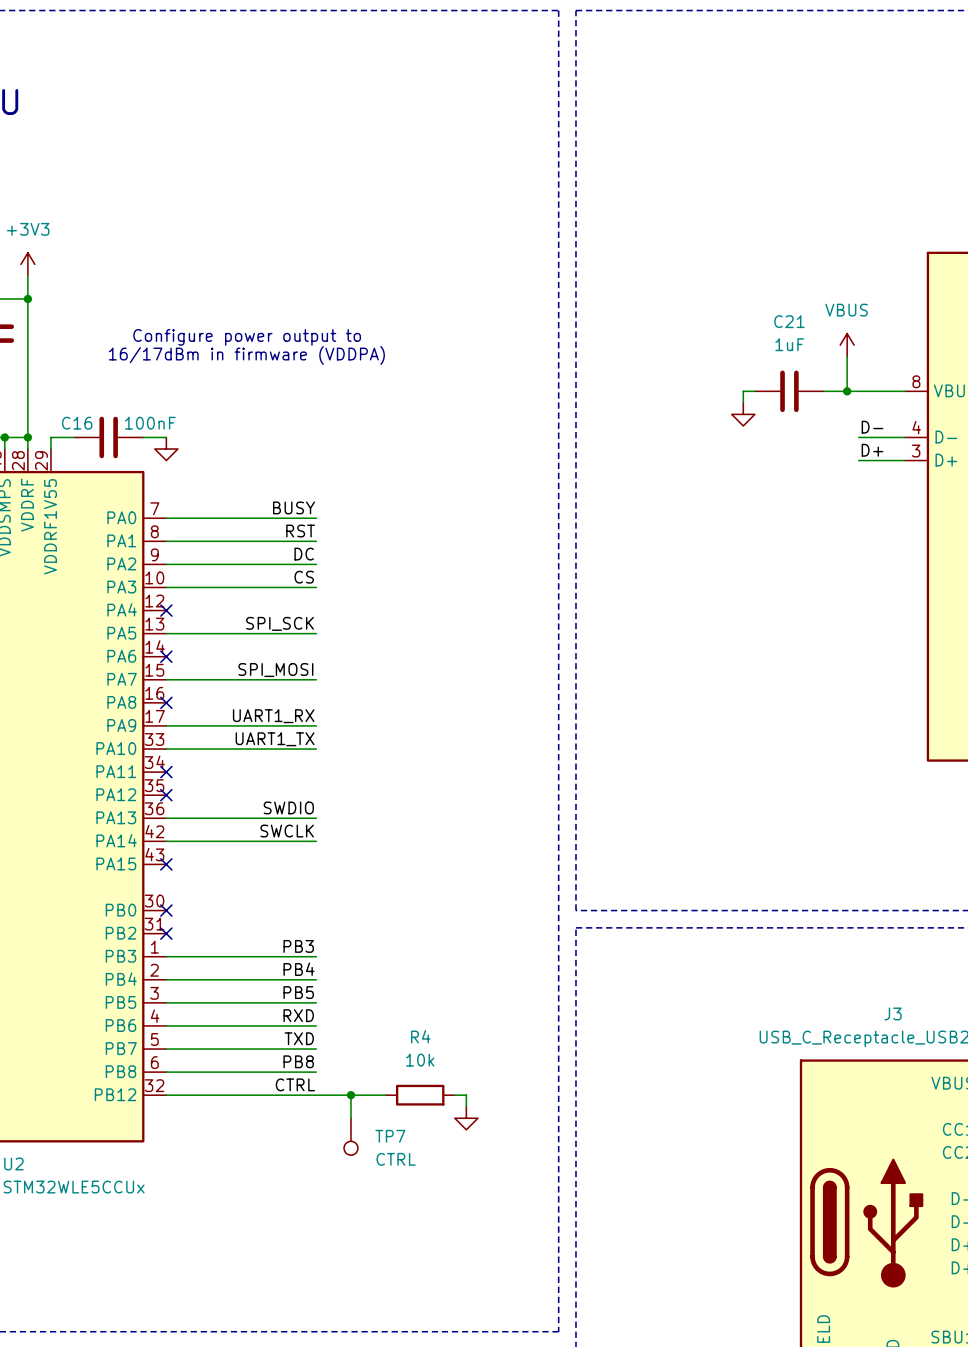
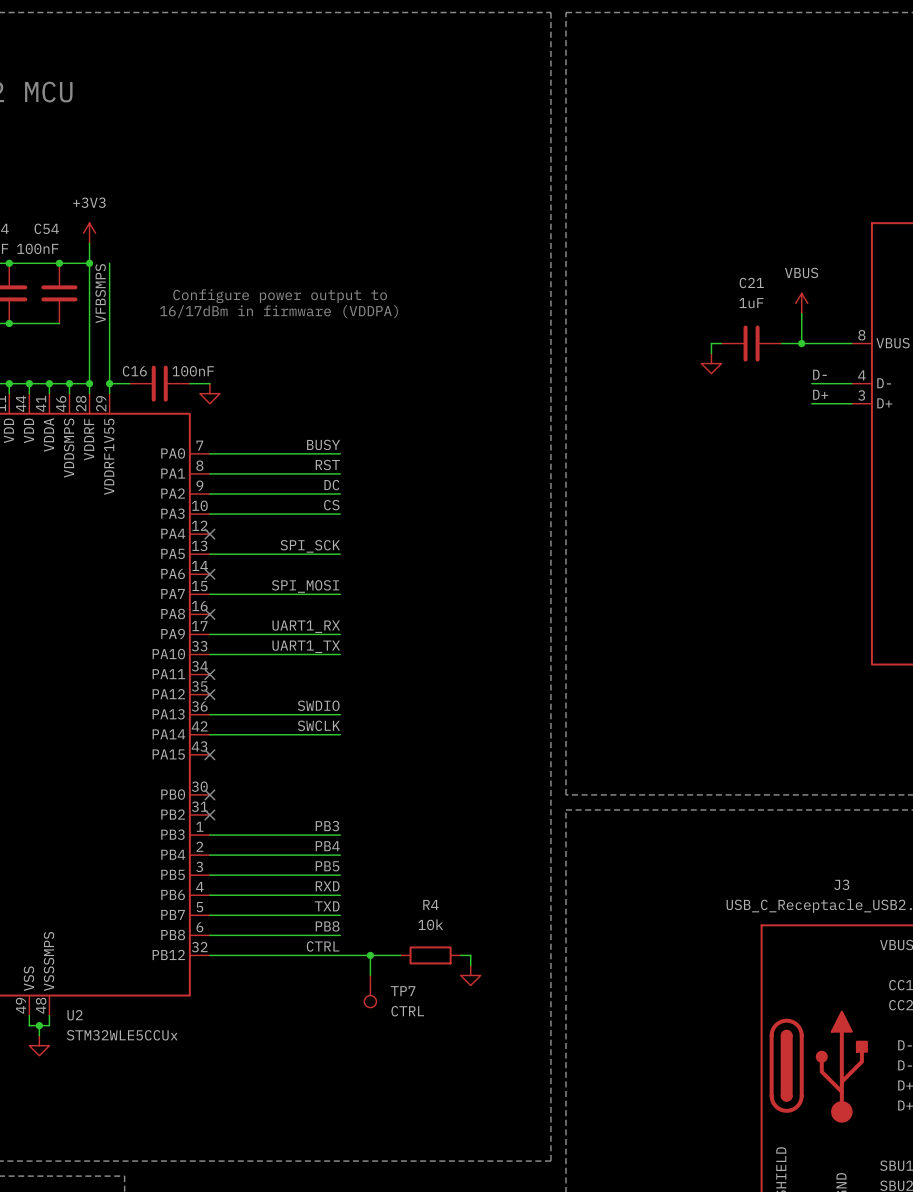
wire: none -> (109, 263) (109, 383)
label: none -> VFBSMPS (100, 293)
junction: none -> (109, 383)

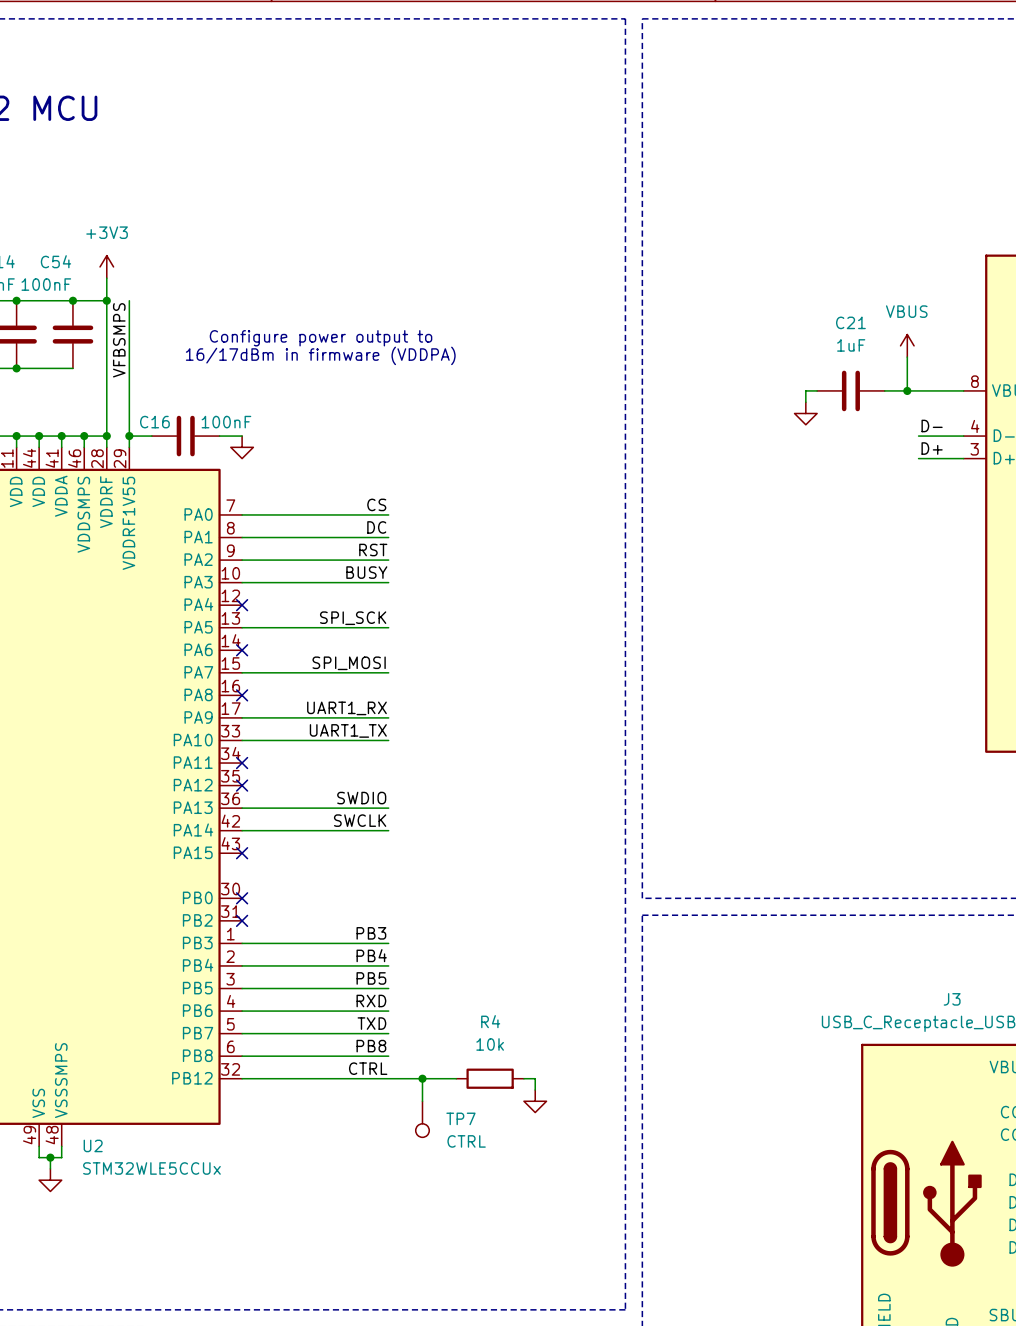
label: BUSY (323, 444) -> CS (376, 504)
label: RST (327, 464) -> DC (376, 527)
label: DC (331, 485) -> RST (373, 550)
label: CS (331, 505) -> BUSY (366, 572)

